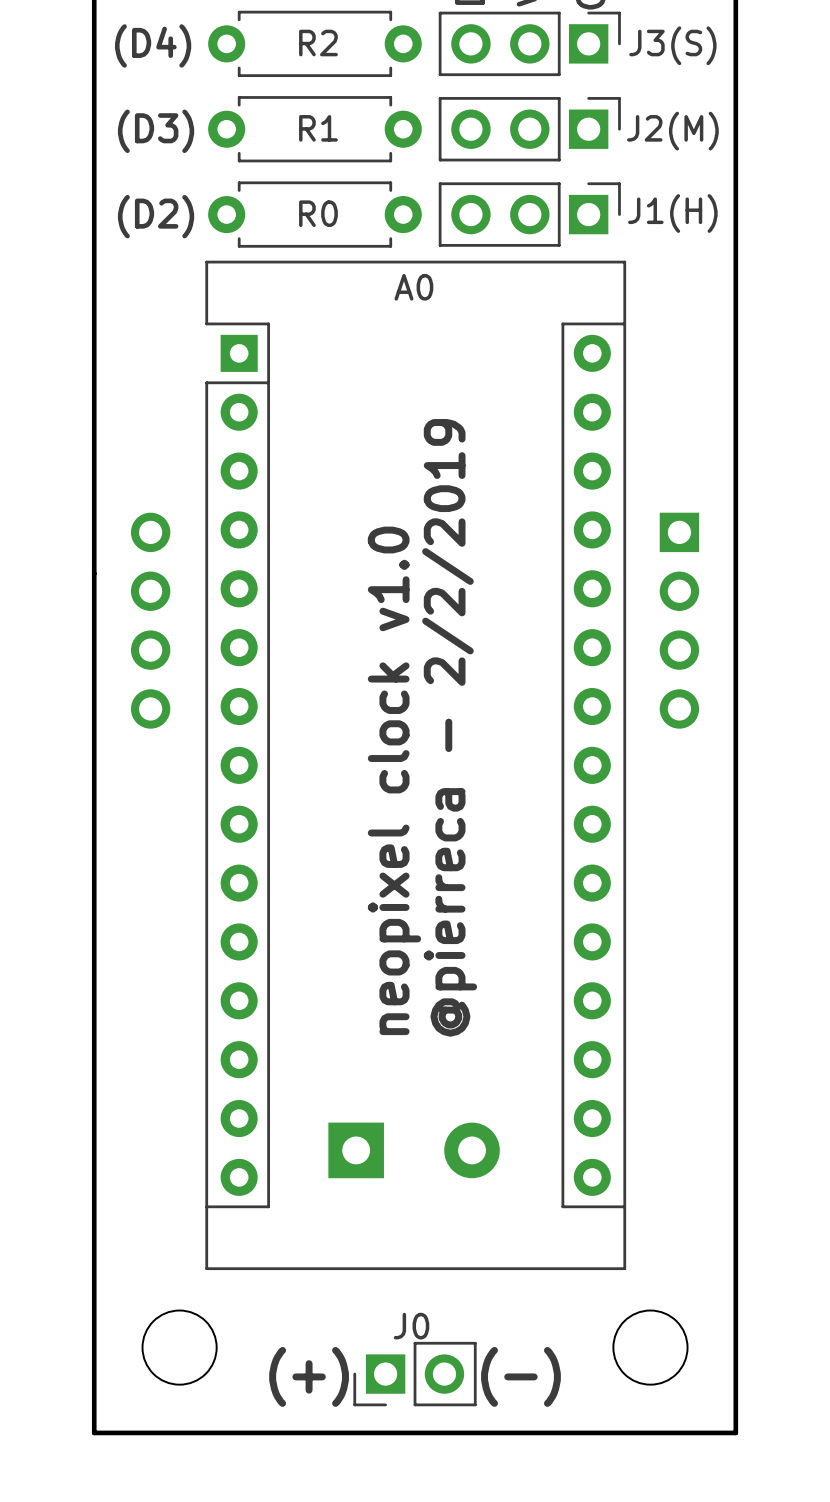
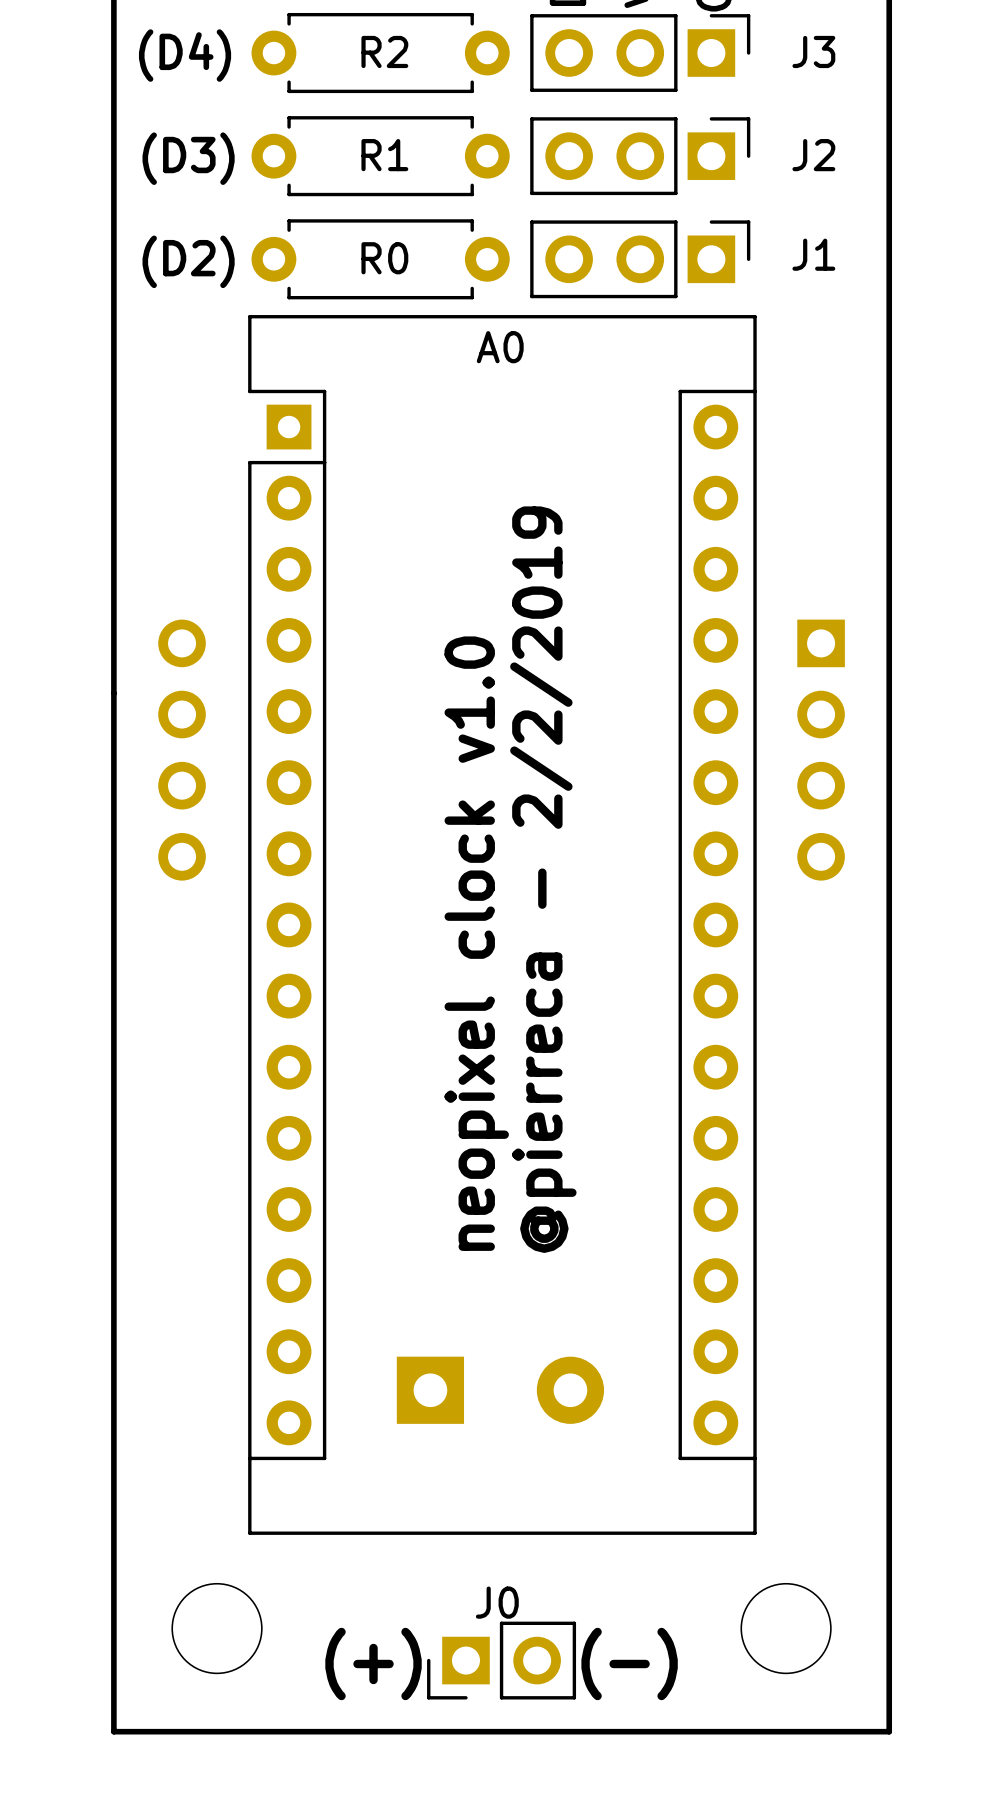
J3(S) name: J3(S) (672, 45) -> J3 (813, 51)
J2(M) name: J2(M) (672, 131) -> J2 (813, 155)
J1(H) name: J1(H) (672, 213) -> J1 (813, 254)

